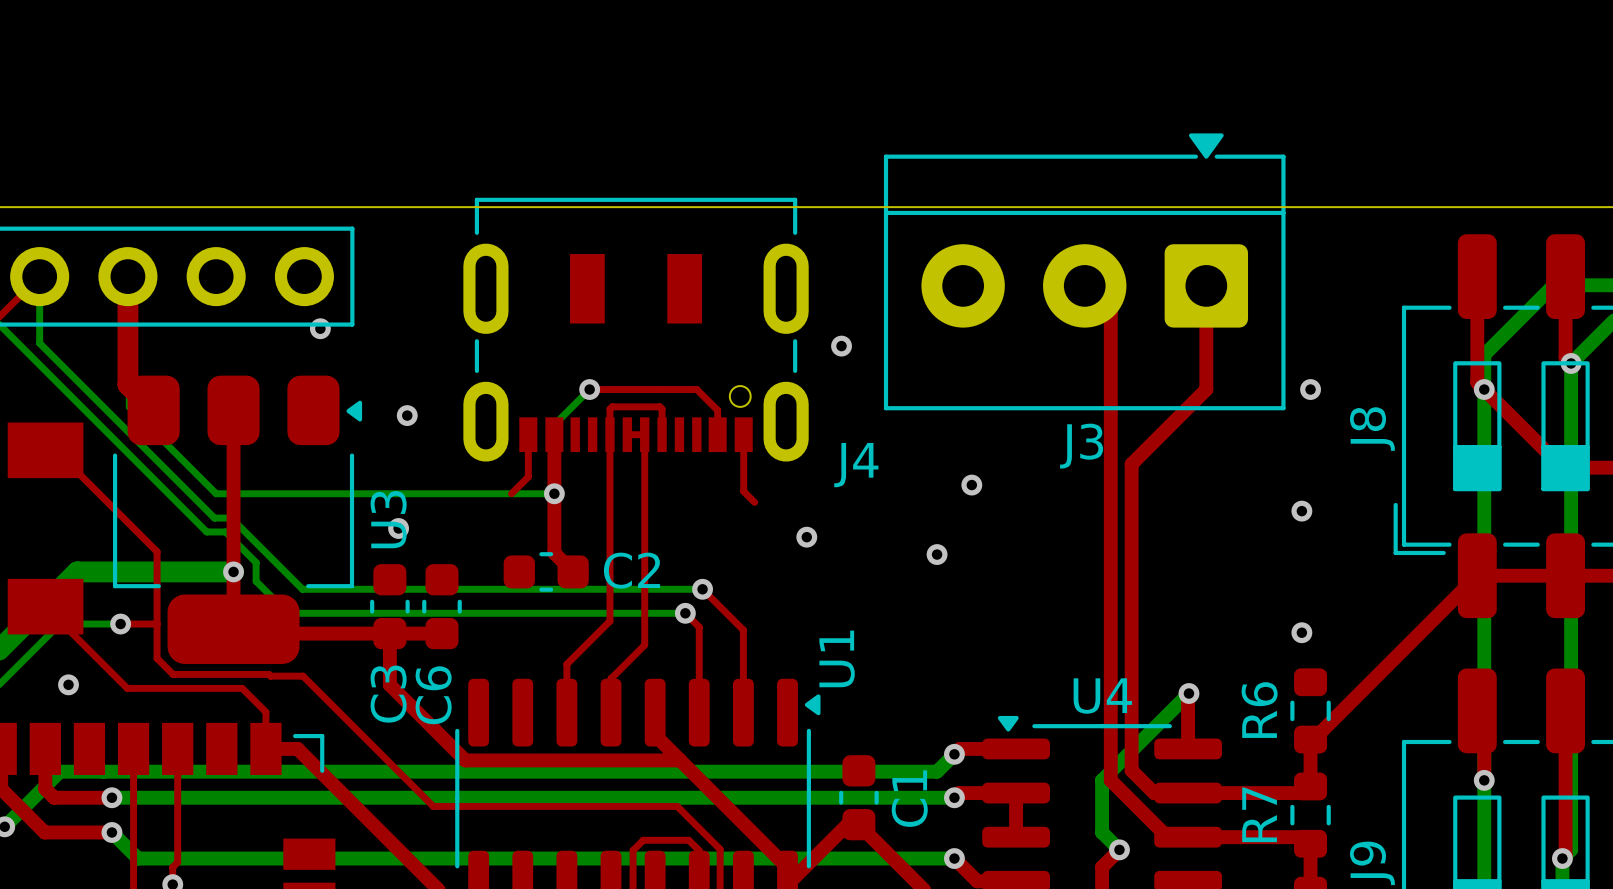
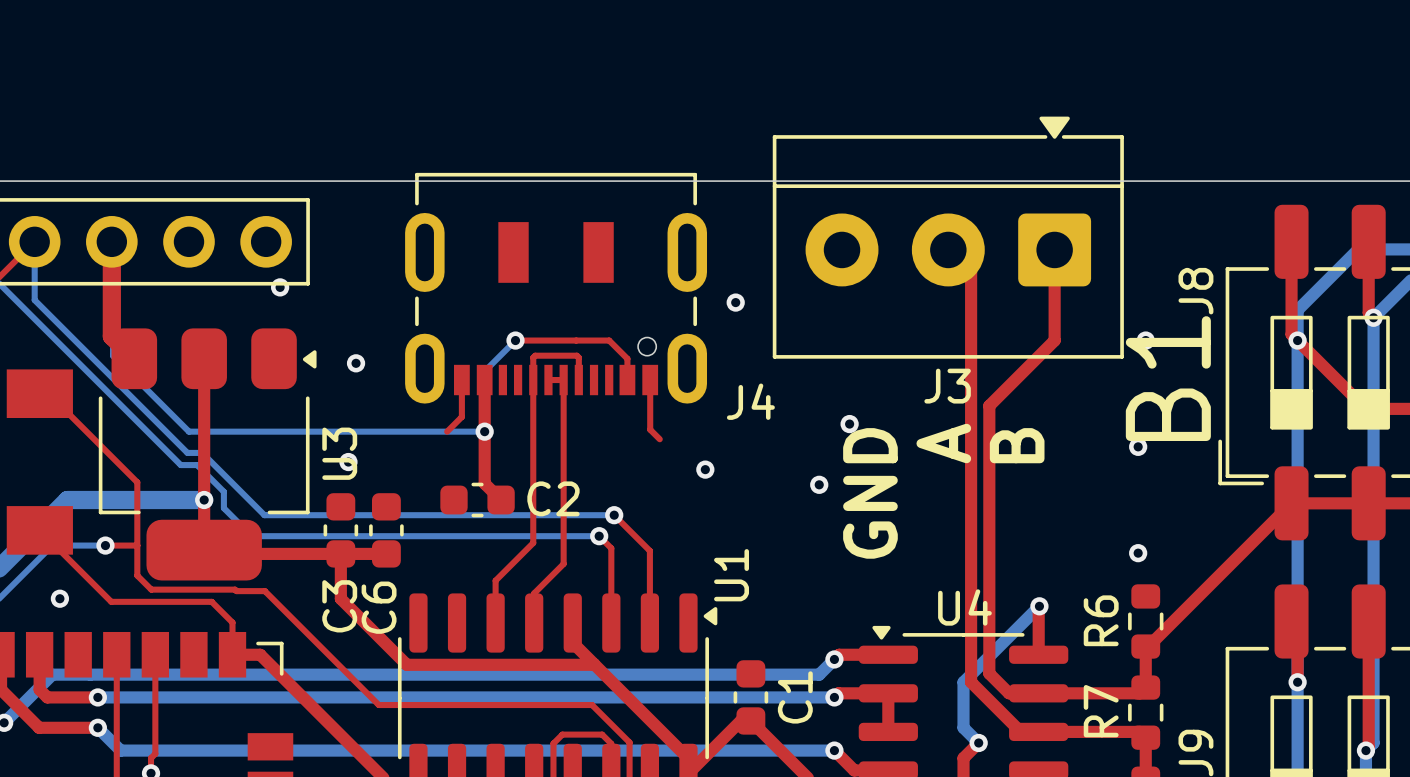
J8 name position: J8 (1372, 429) -> J8 (1195, 291)
text: none -> B1 (1168, 378)
text: none -> B (1017, 445)
text: none -> A (943, 443)
text: none -> GND (870, 493)

